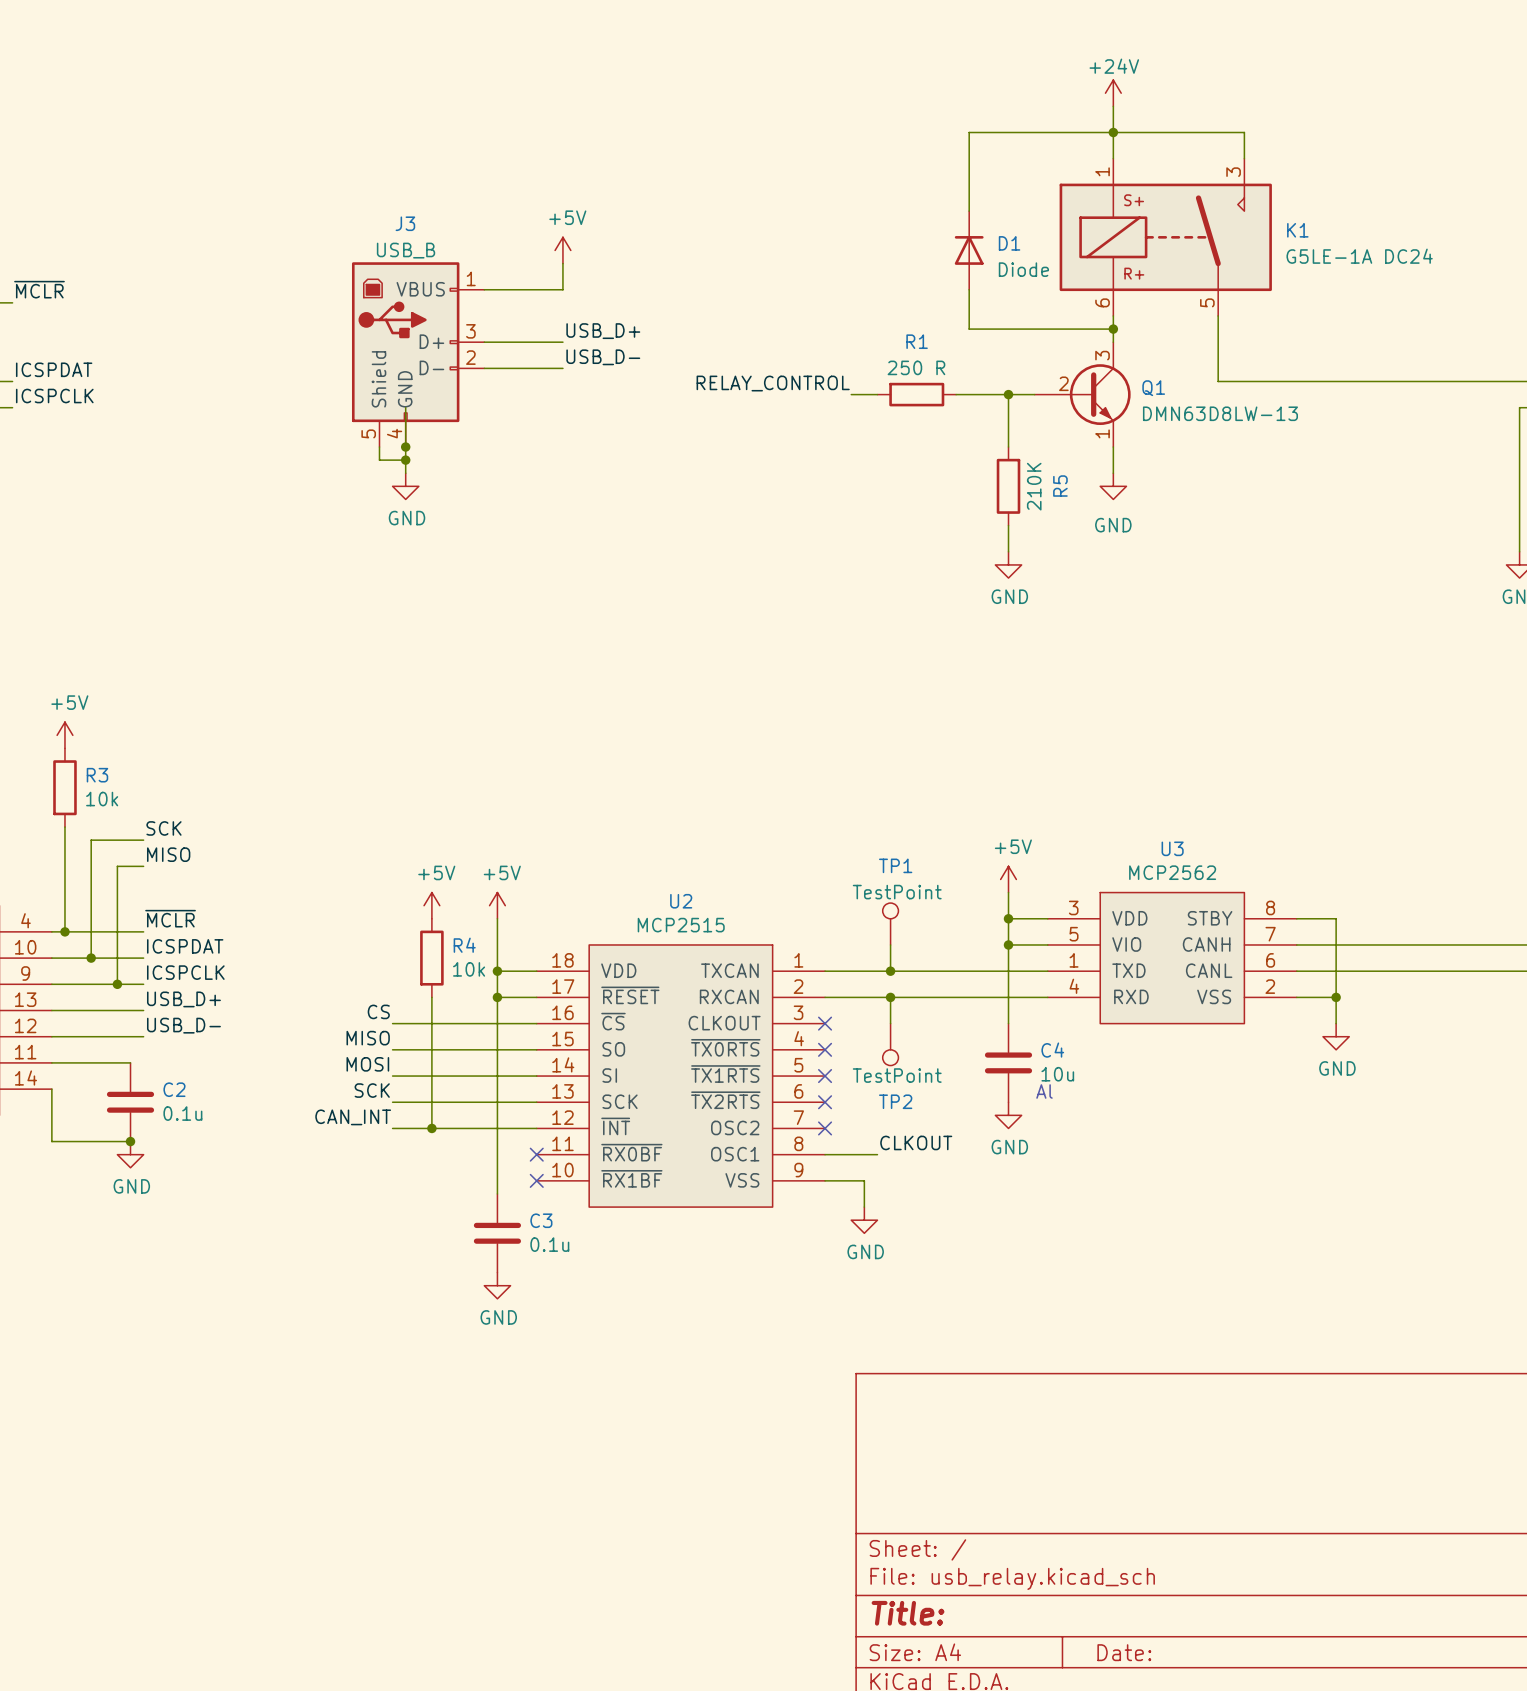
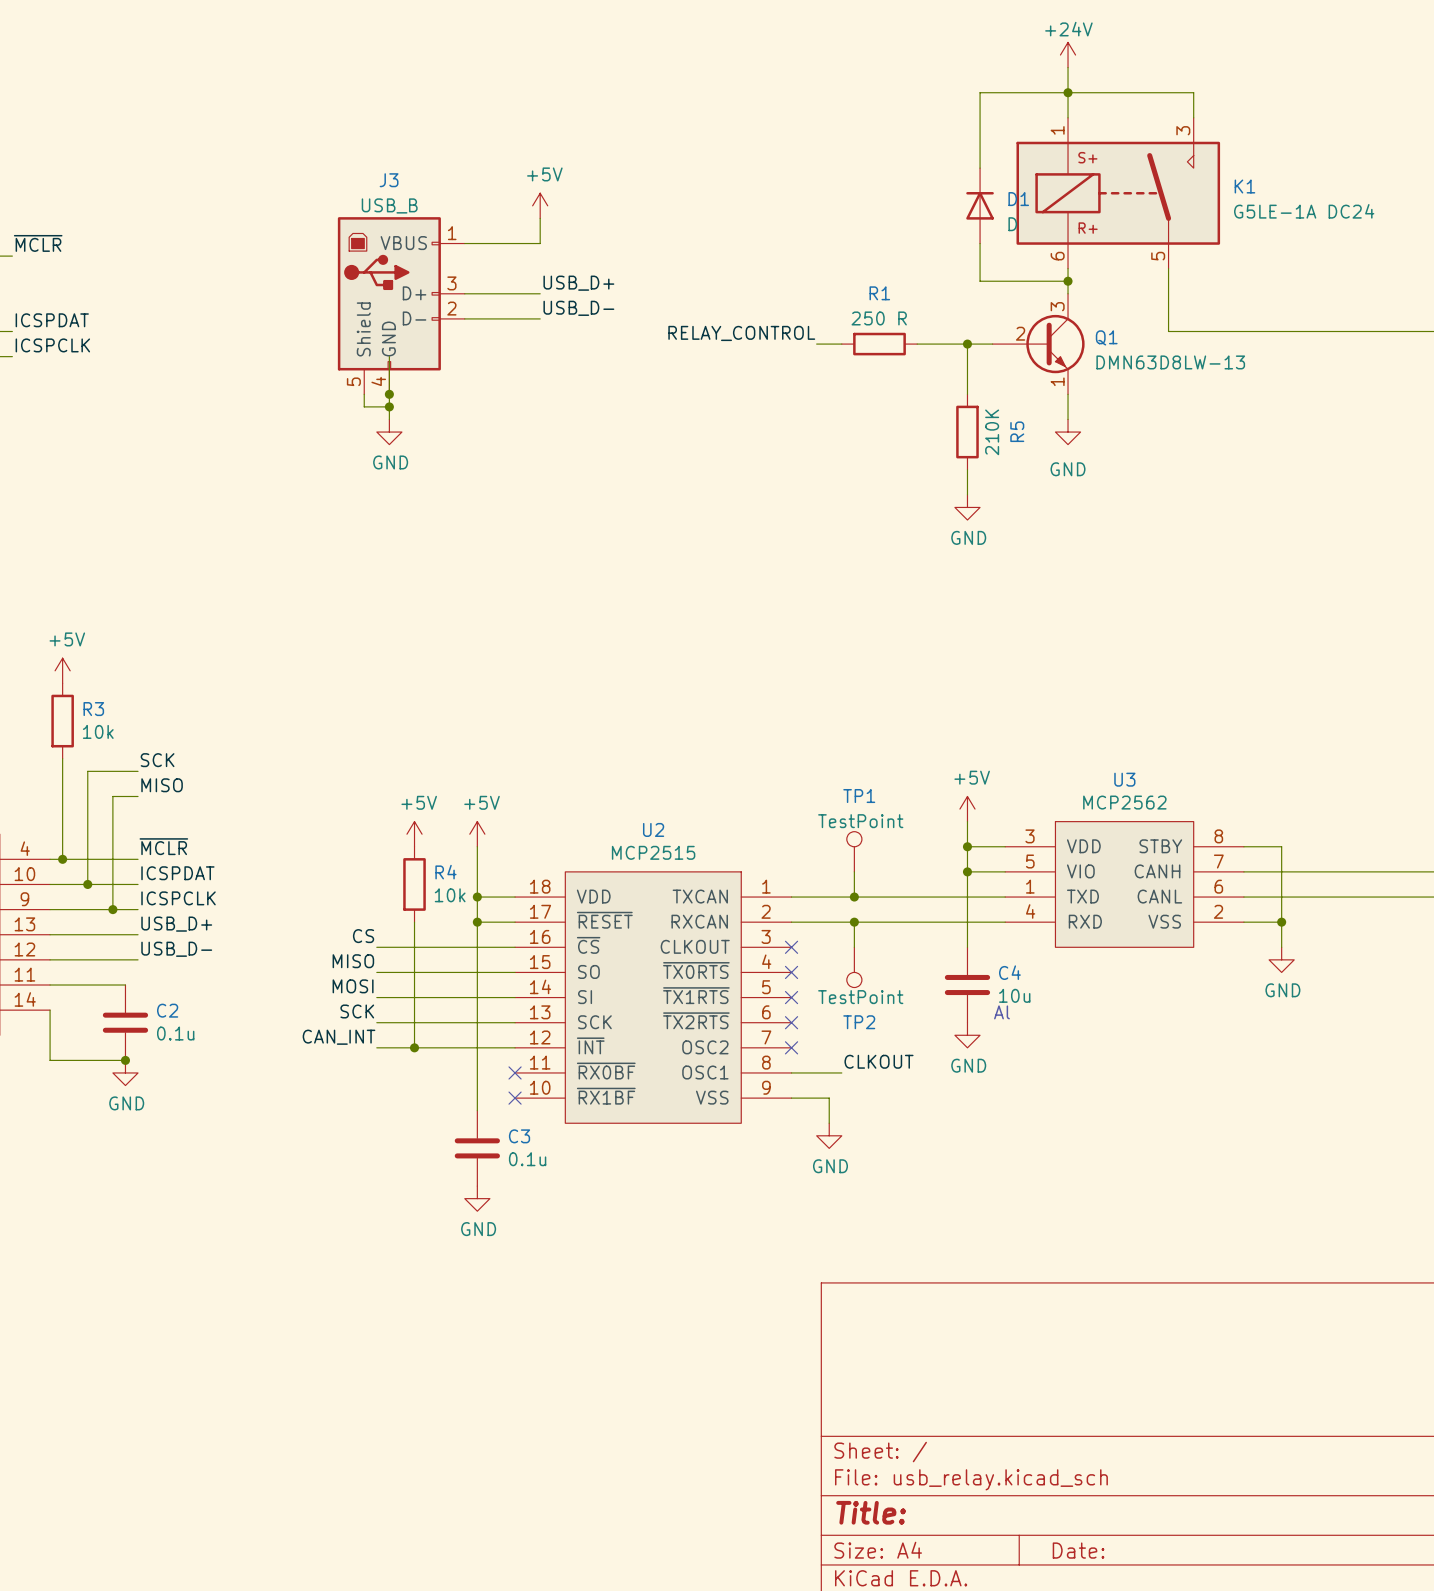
wire: (1021, 132) (969, 132) (969, 211) -> (980, 92) (980, 168)
D1 position: (969, 250) -> (980, 205)
D1 value: Diode (1023, 269) -> D (1012, 224)
wire: (969, 289) (969, 329) (1021, 329) -> (980, 243) (980, 281)

